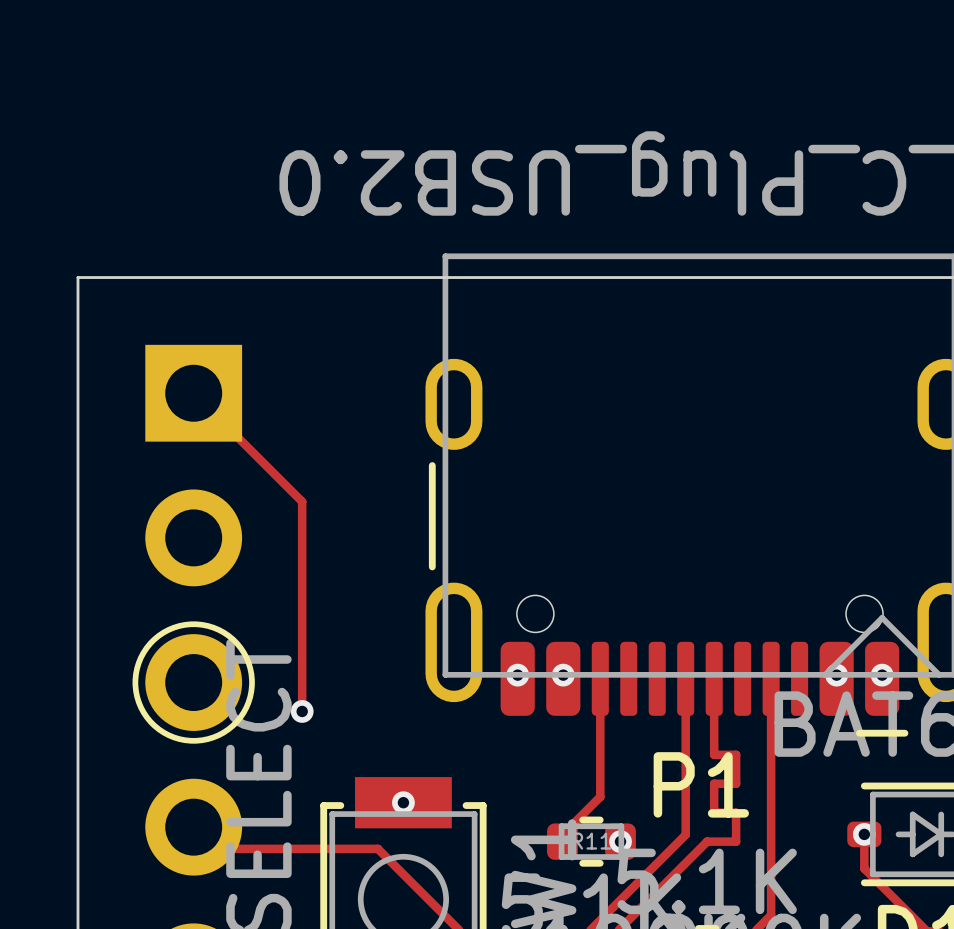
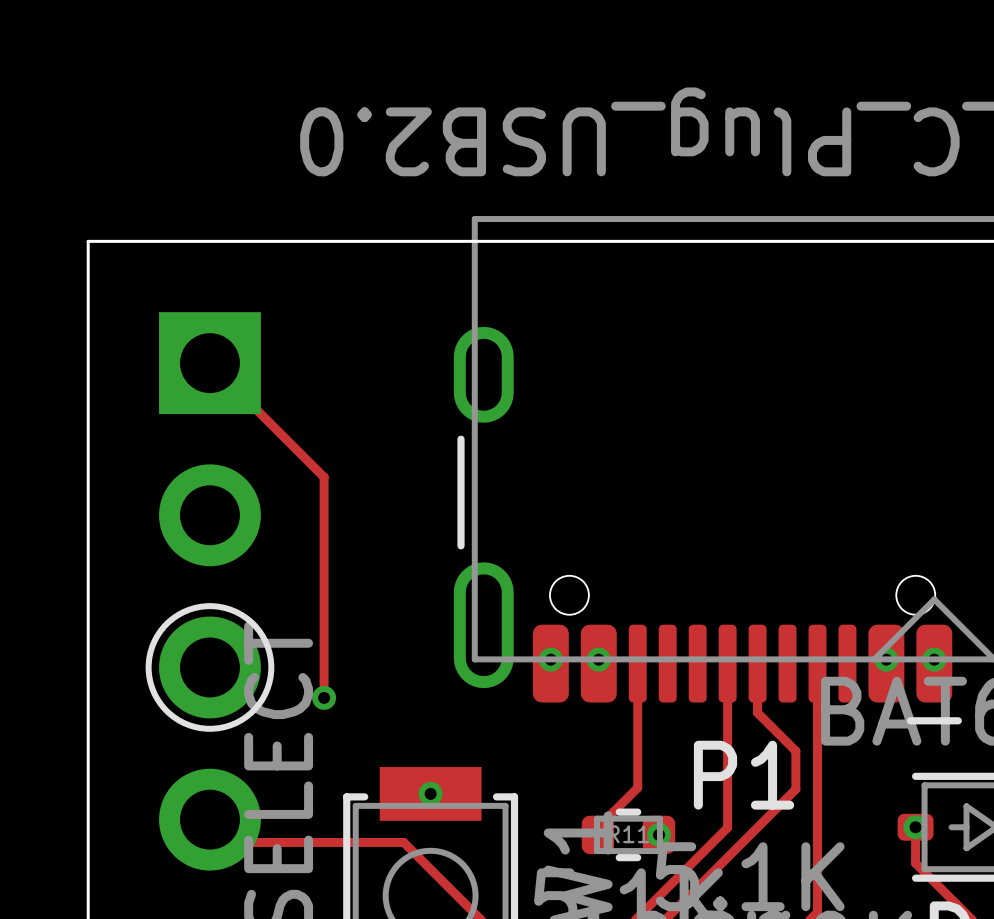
track: (714, 725) (714, 754) (736, 754) (736, 783) (714, 783) (714, 812) (736, 812) (736, 841) (707, 841) -> (757, 712) (795, 751) (795, 789) (750, 834)

